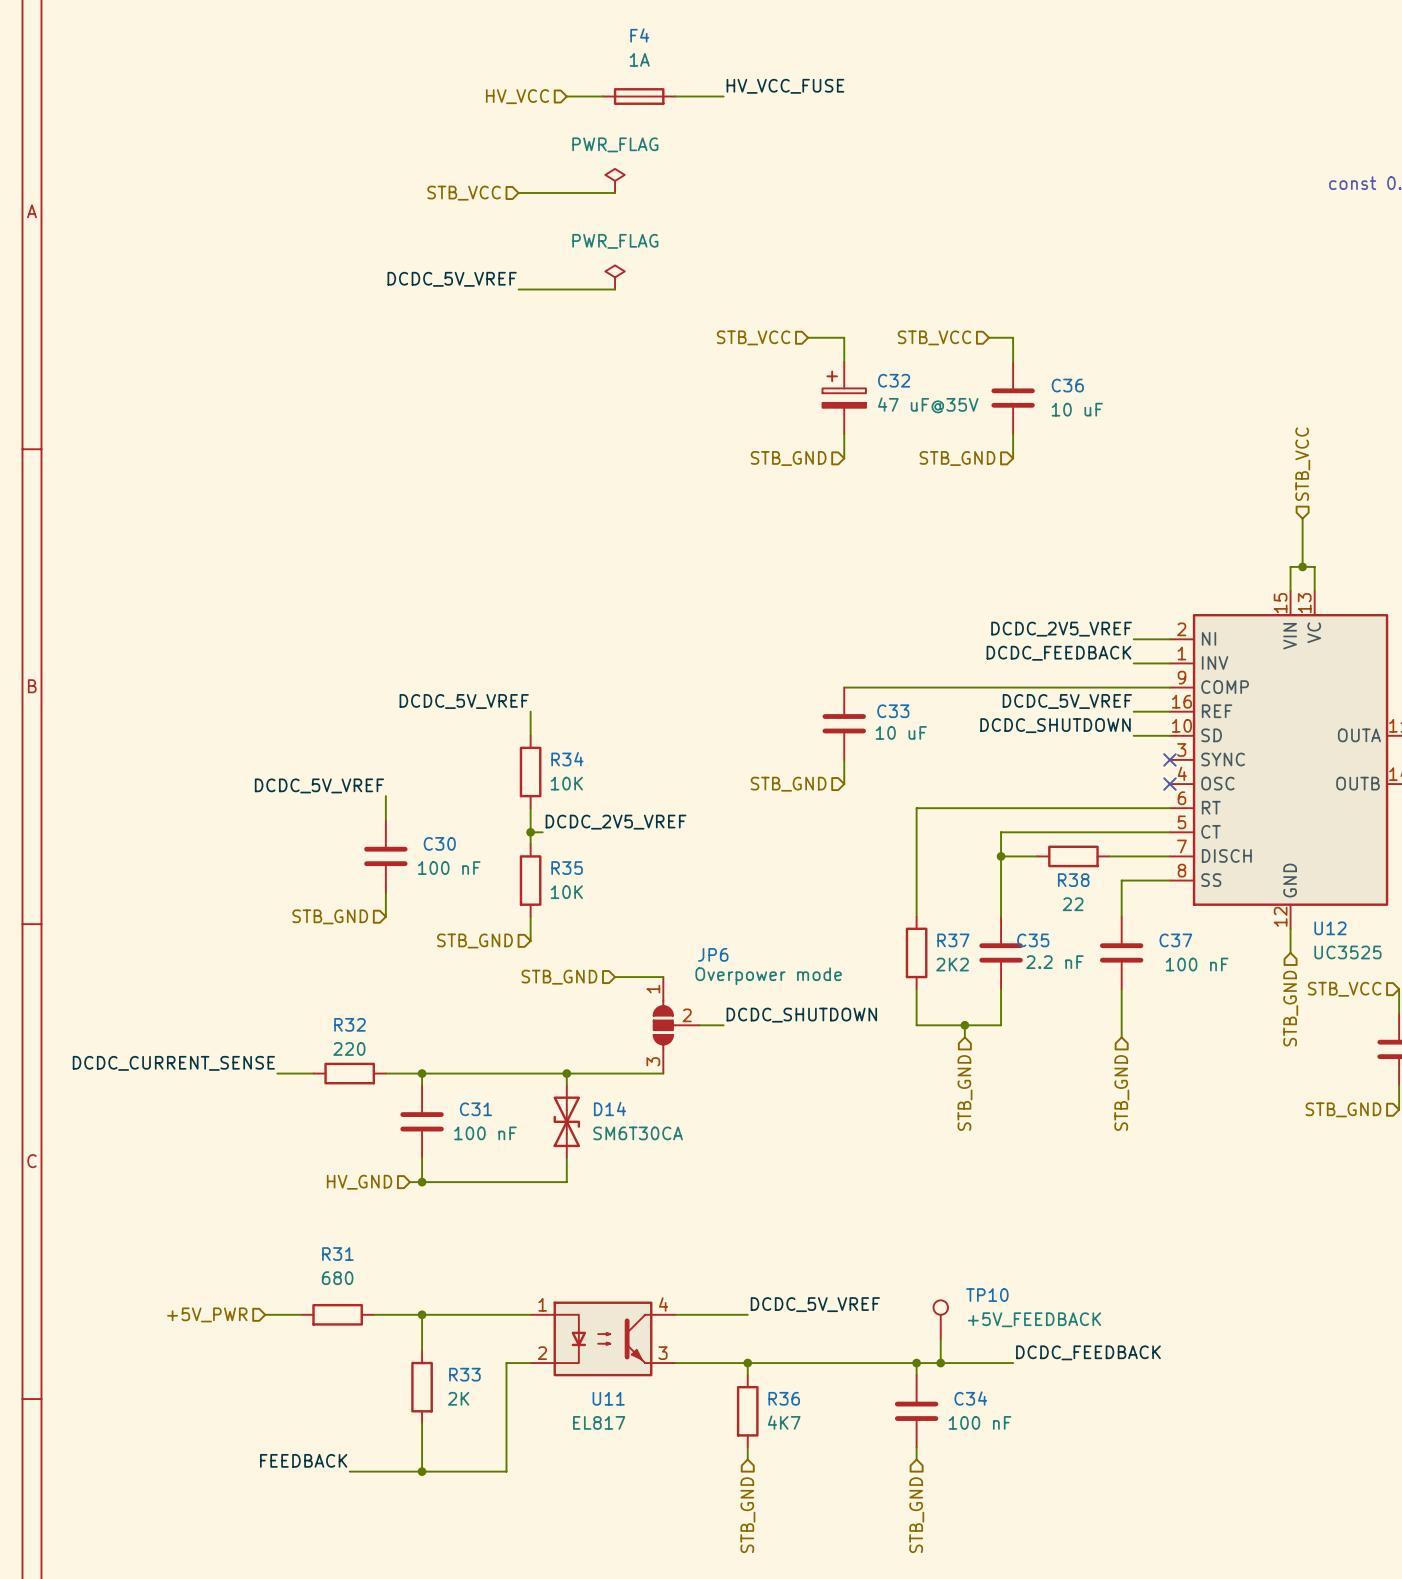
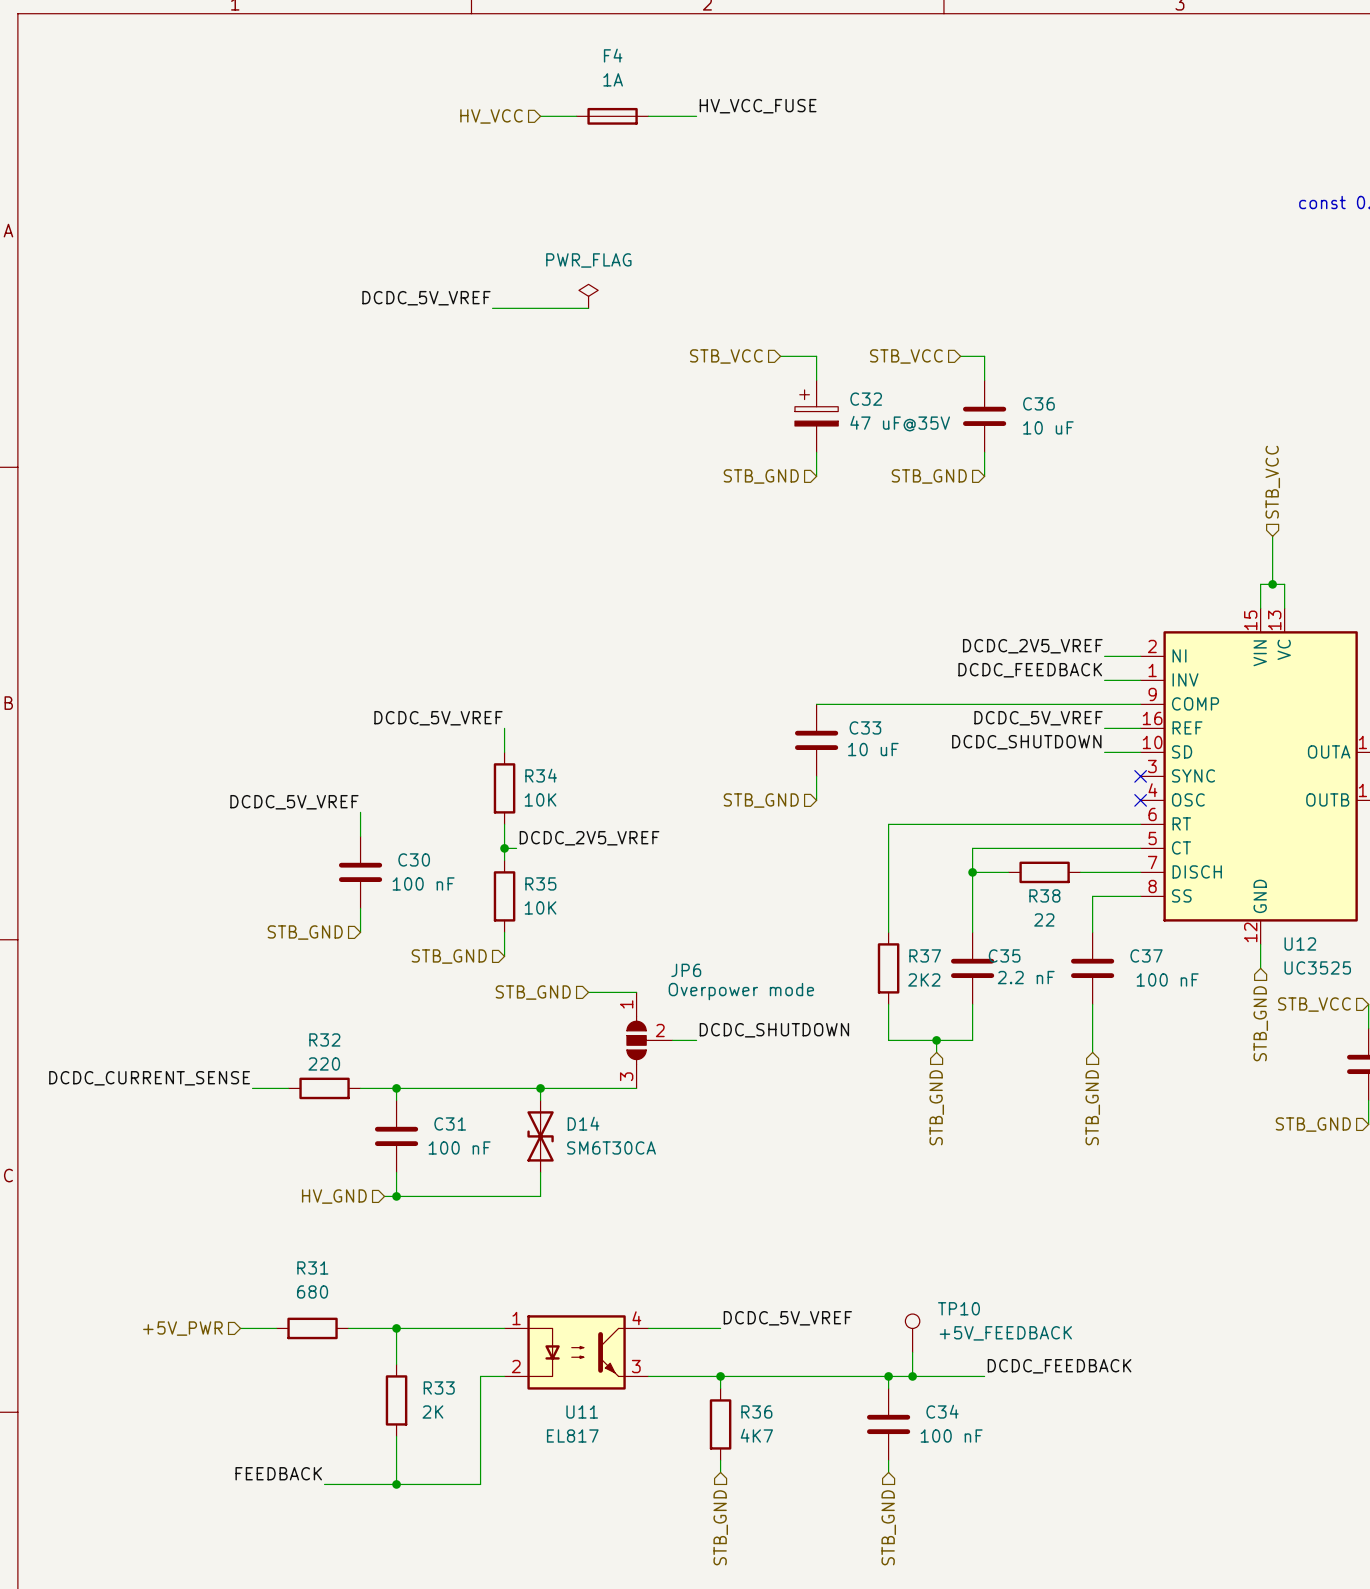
power symbol: PWR_FLAG (615, 180) -> none
hierarchical label: STB_VCC (464, 193) -> none
wire: (518, 193) (615, 193) -> none

